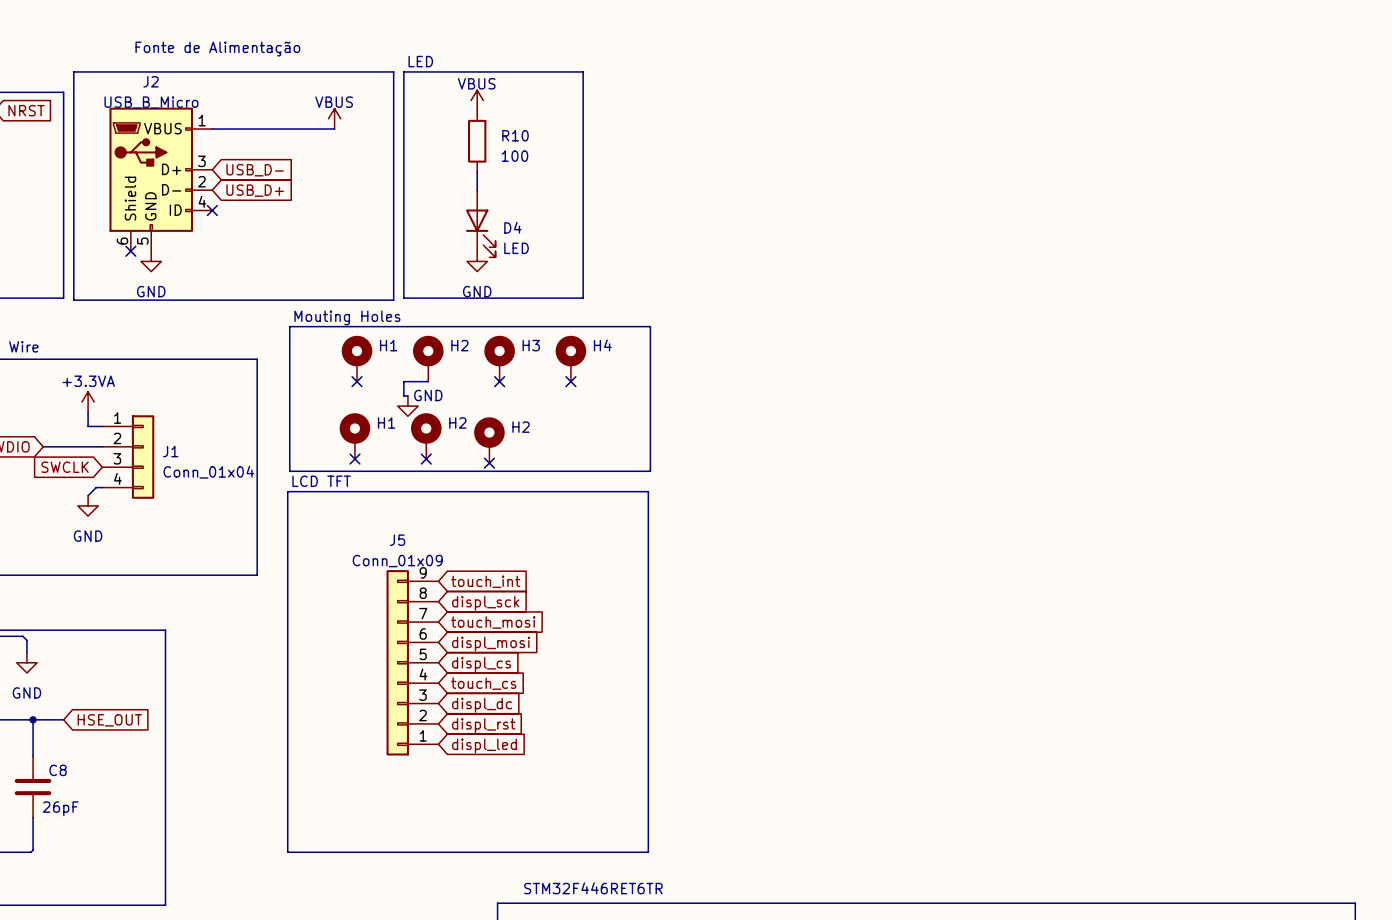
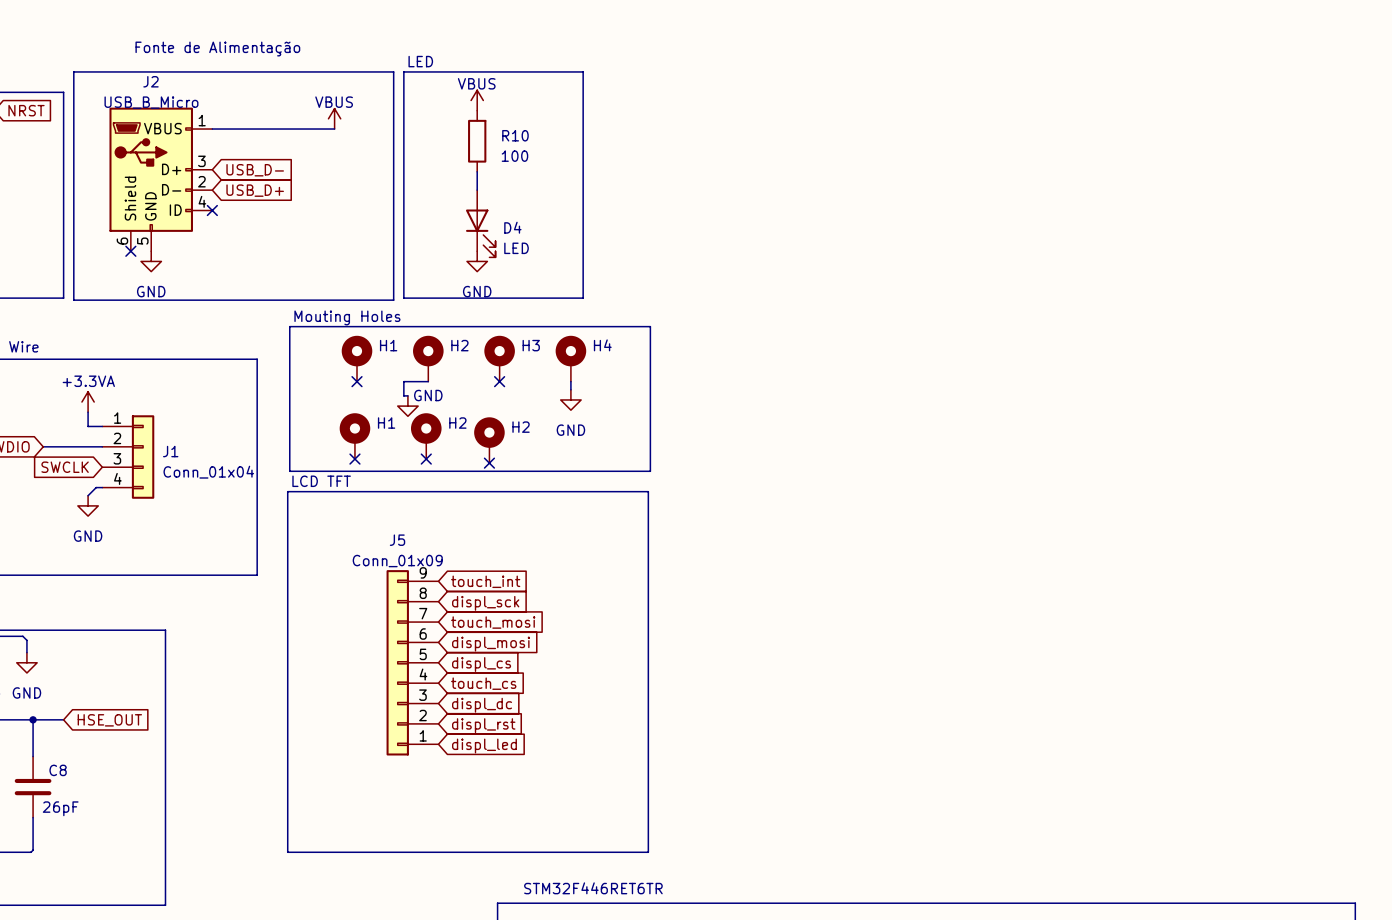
wire: none -> (570, 381) (570, 389)
no-connect mark: (570, 381) -> none
power symbol: none -> GND (570, 399)

